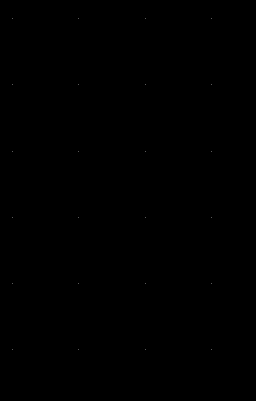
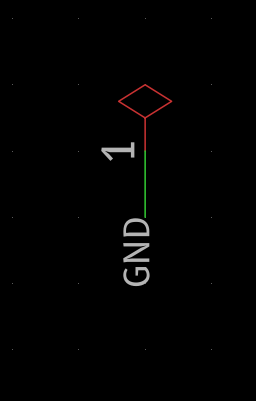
power symbol: none -> (145, 117)
wire: none -> (145, 151) (145, 217)
label: none -> GND (136, 252)

